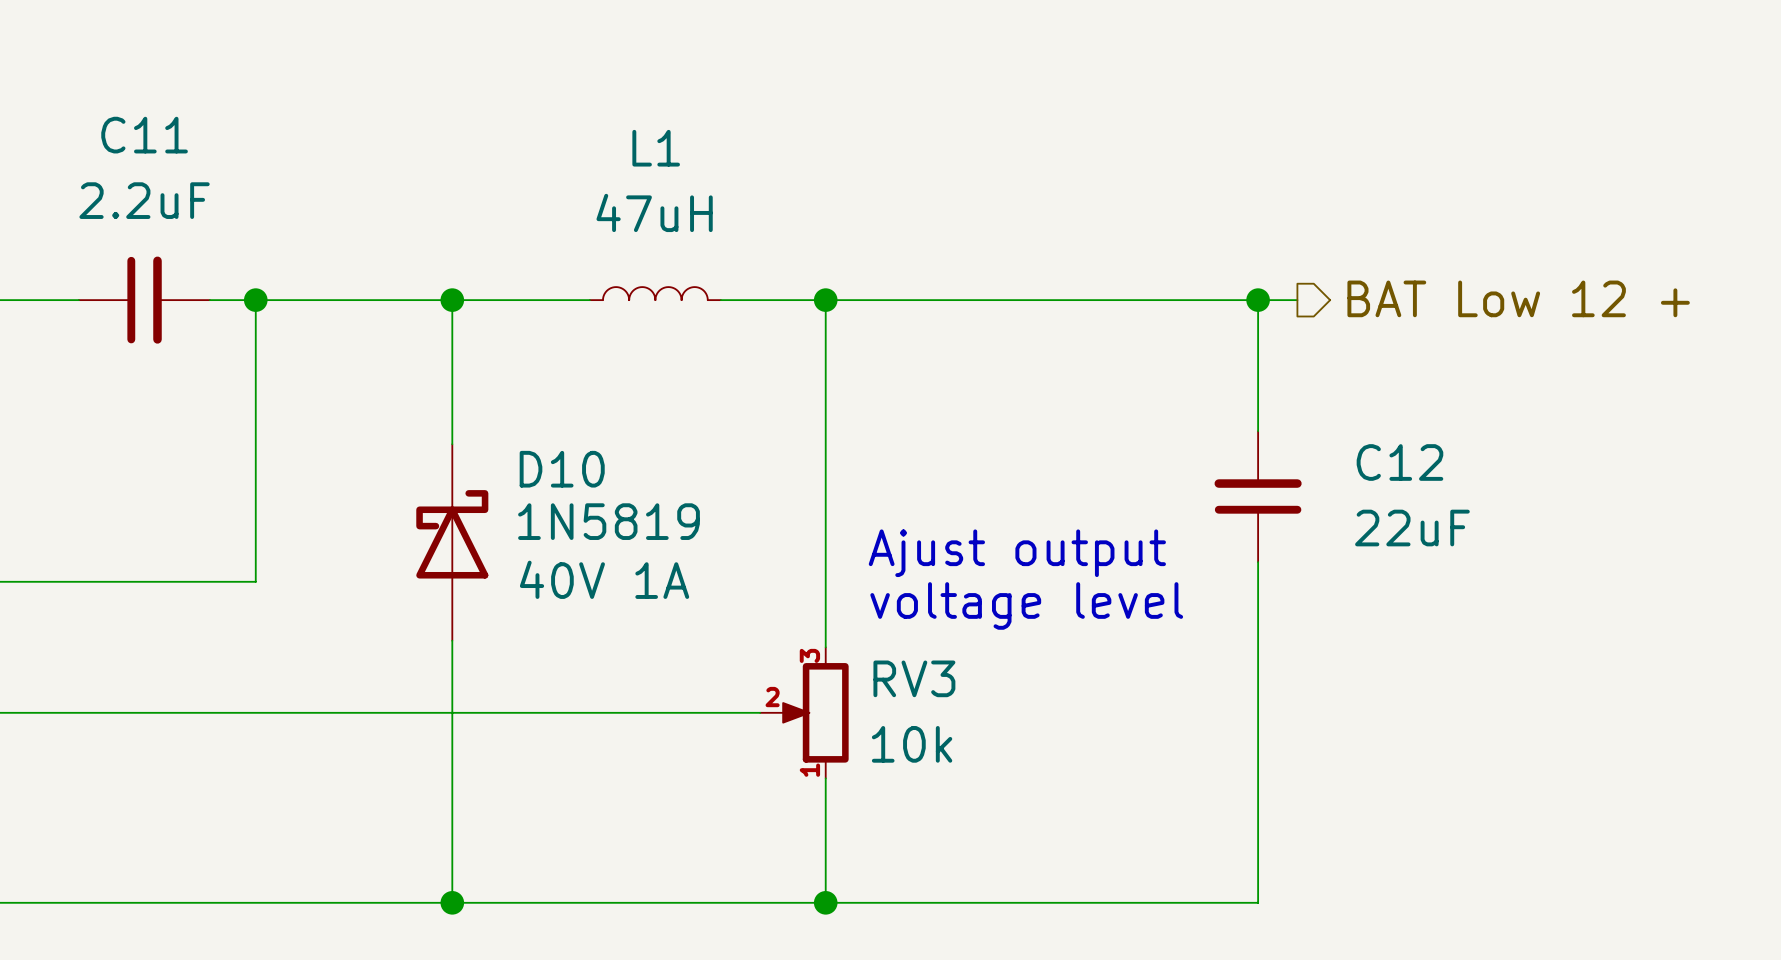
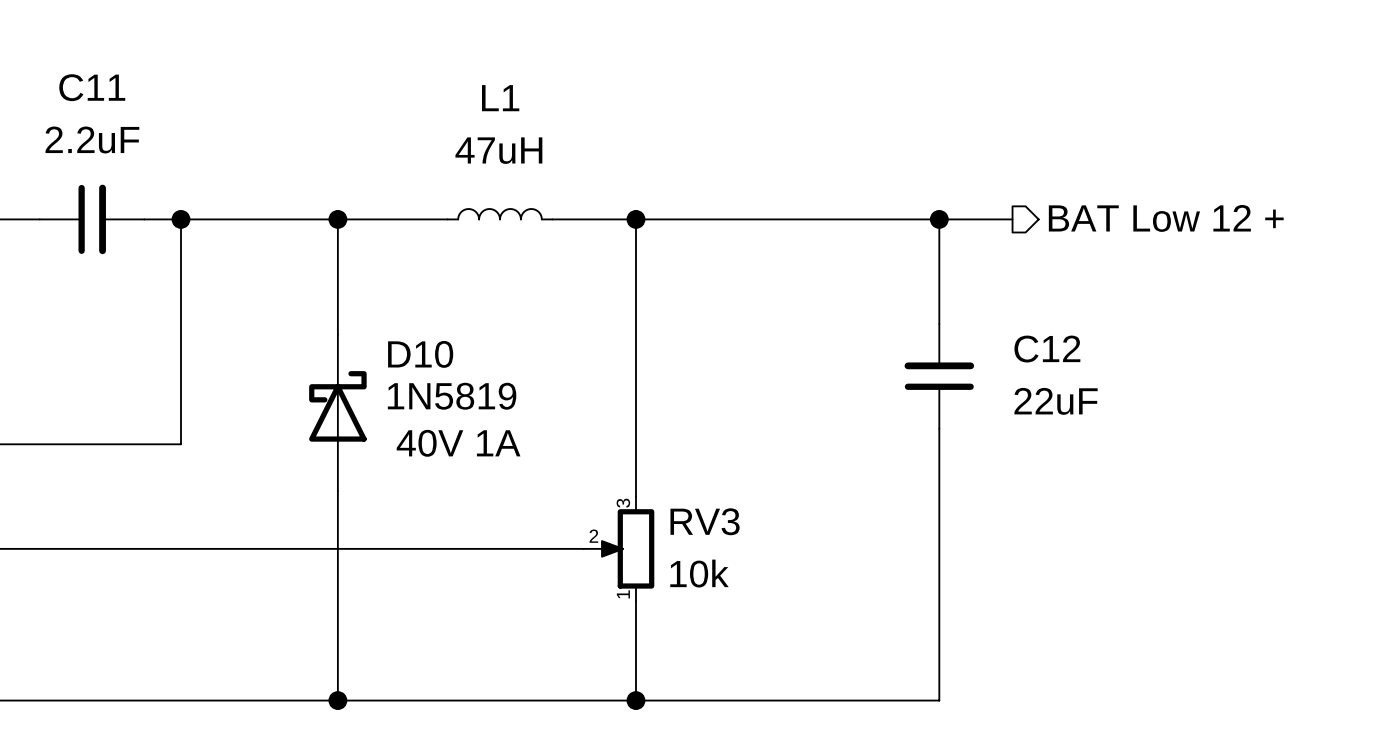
wire: (1258, 300) (1258, 431) -> (939, 219) (939, 324)
junction position: (1258, 300) -> (939, 219)
C12 position: (1258, 496) -> (939, 376)
text: Ajust output (1017, 553) -> none
wire: (1258, 562) (1258, 902) (1205, 902) -> (939, 428) (939, 700)
text: voltage level (1026, 605) -> none

